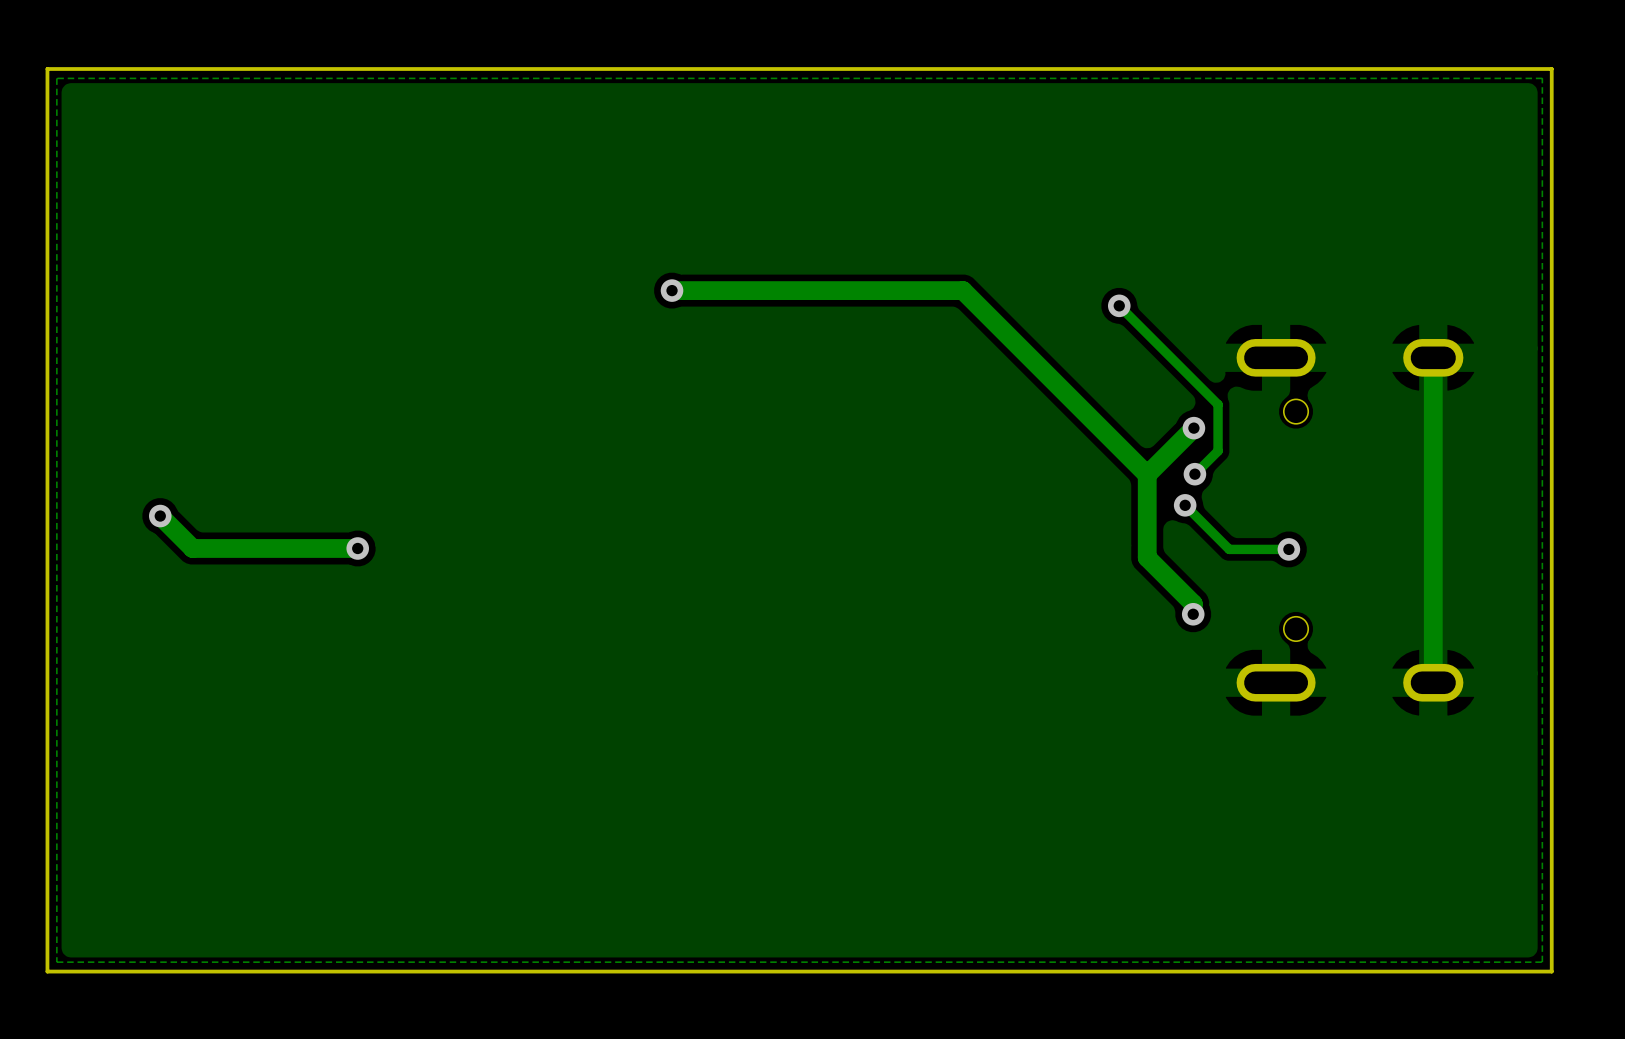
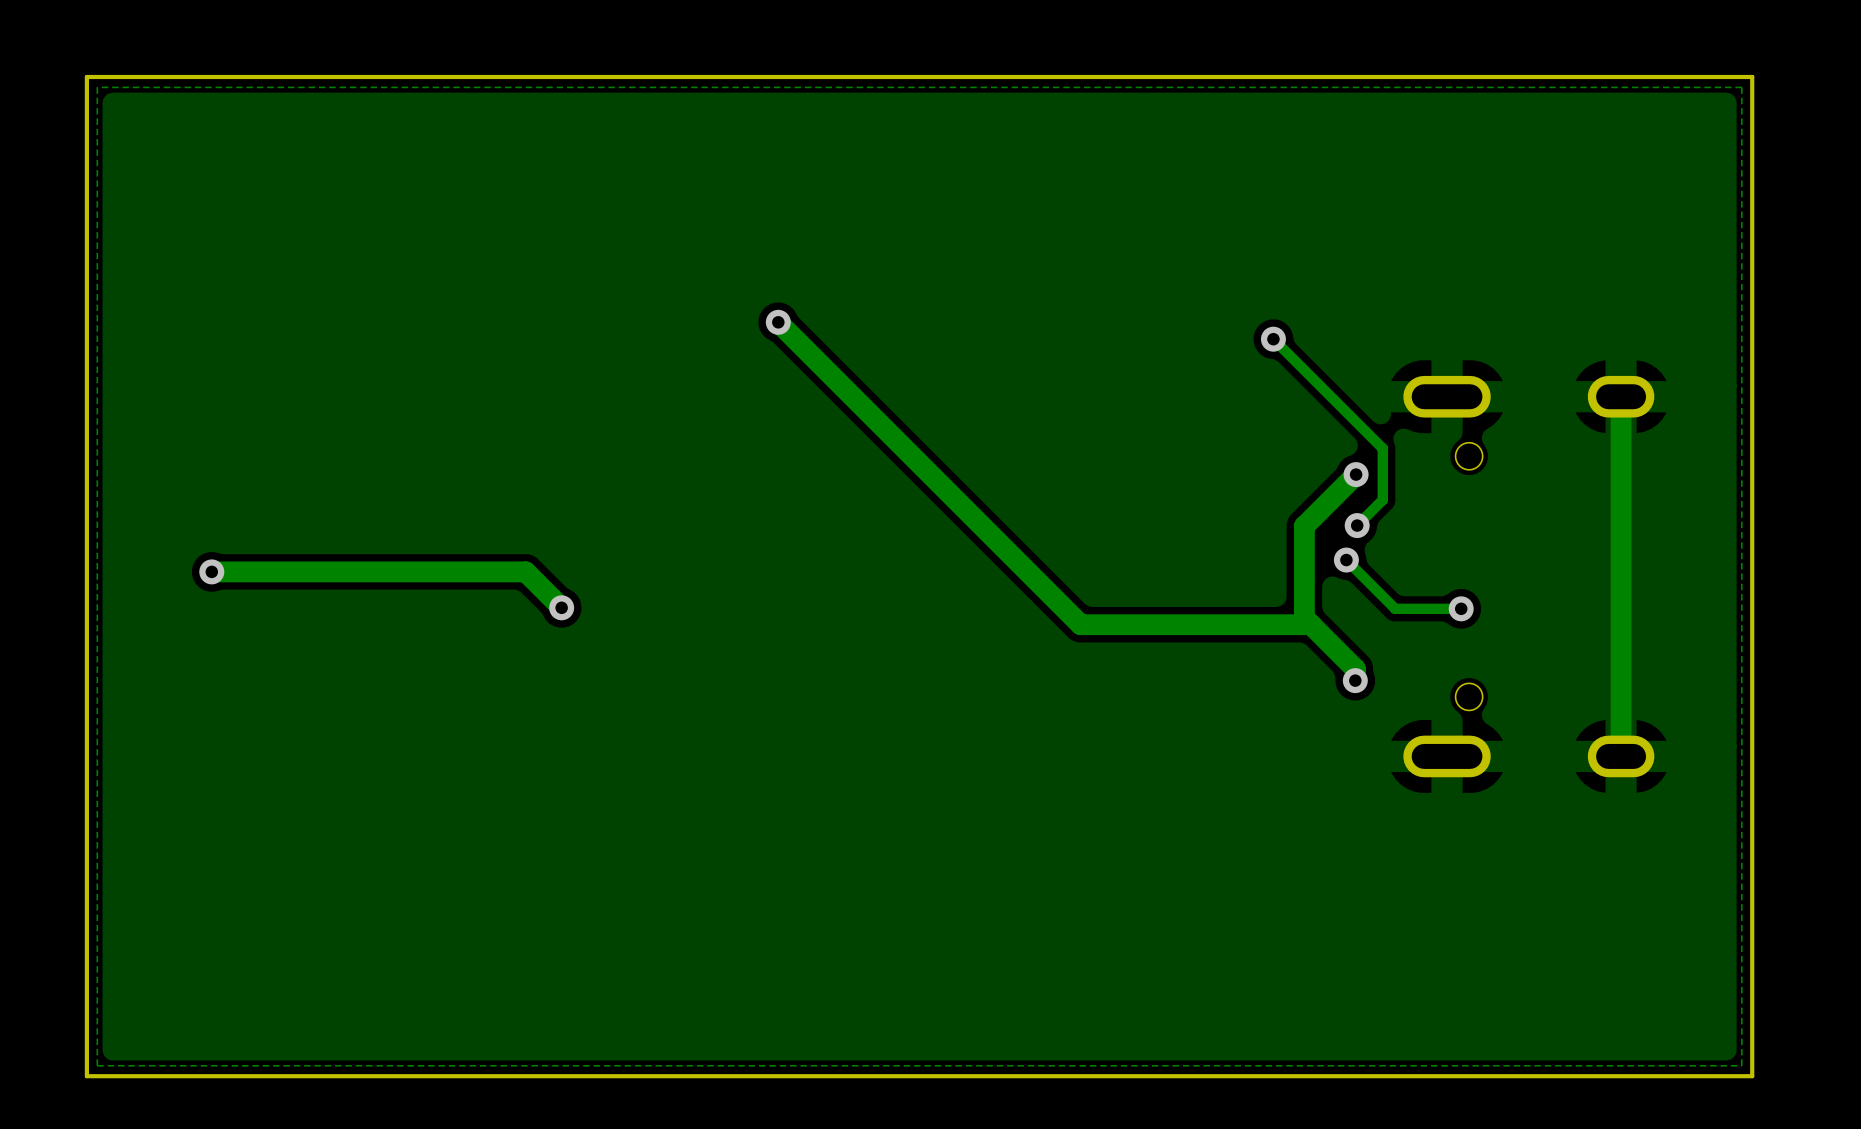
track: (672, 290) (963, 290) (1147, 474) -> (778, 322) (1080, 624) (1311, 624)
track: (160, 516) (192, 548) (357, 548) -> (211, 571) (525, 571) (561, 607)
via position: (357, 548) -> (561, 607)

